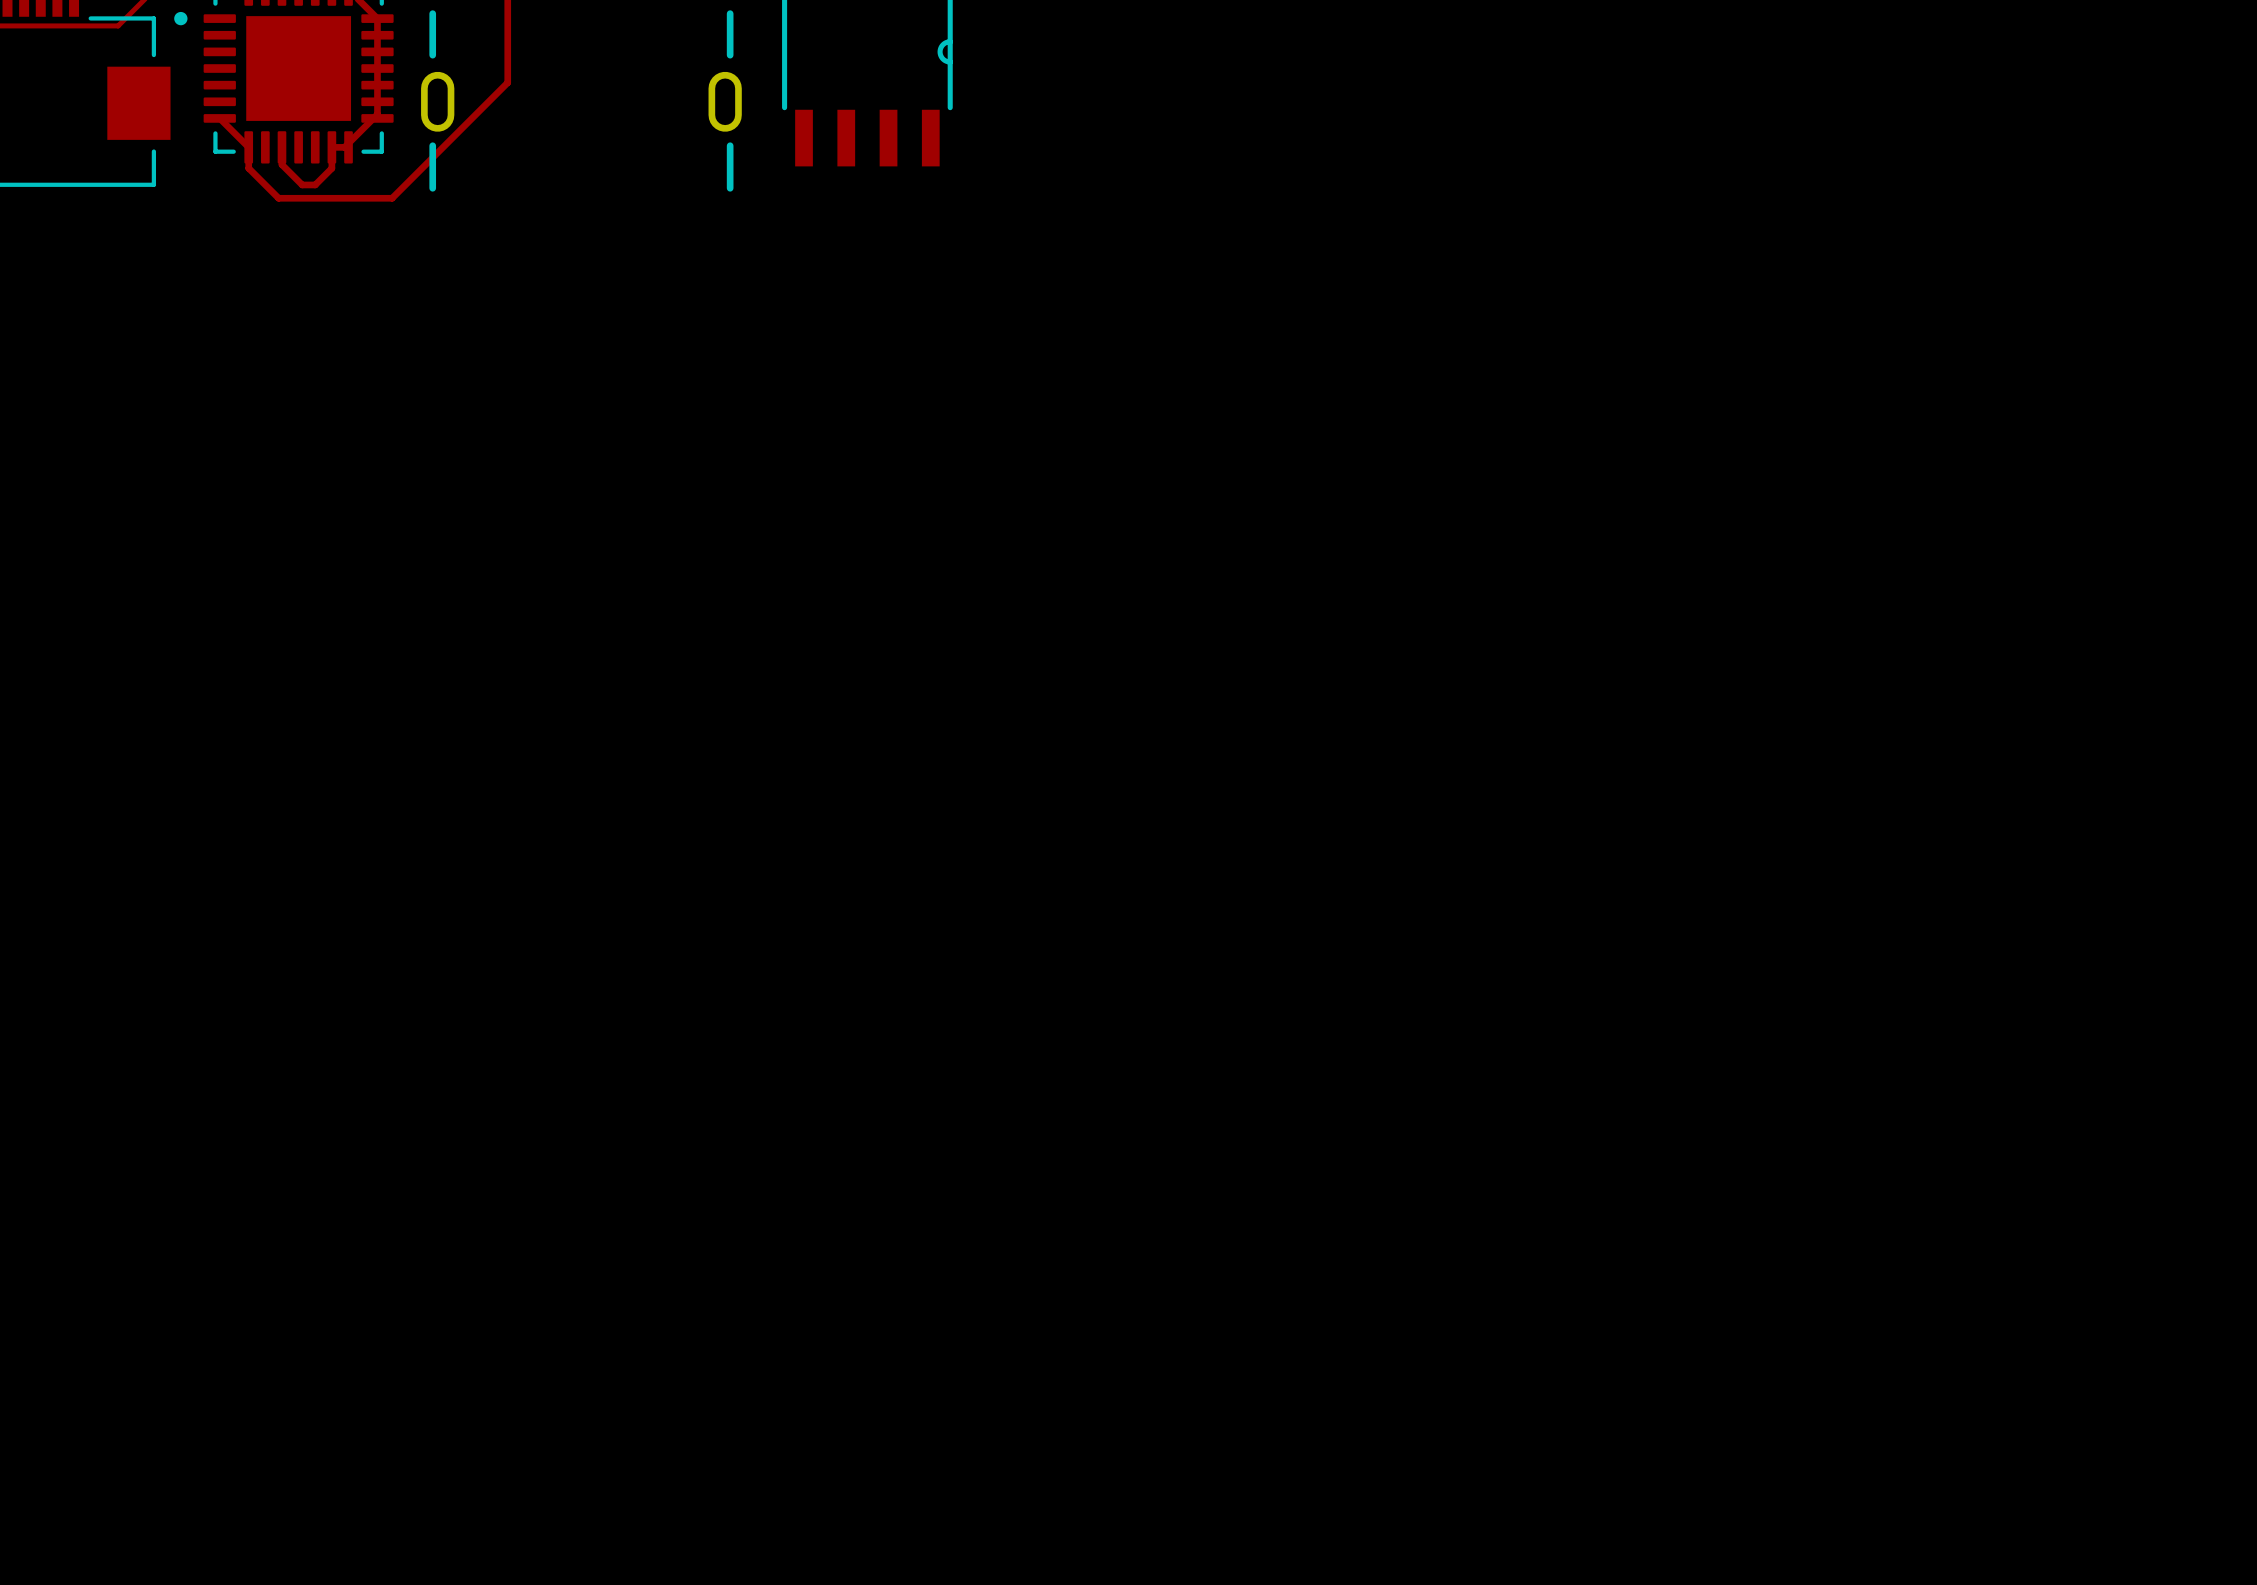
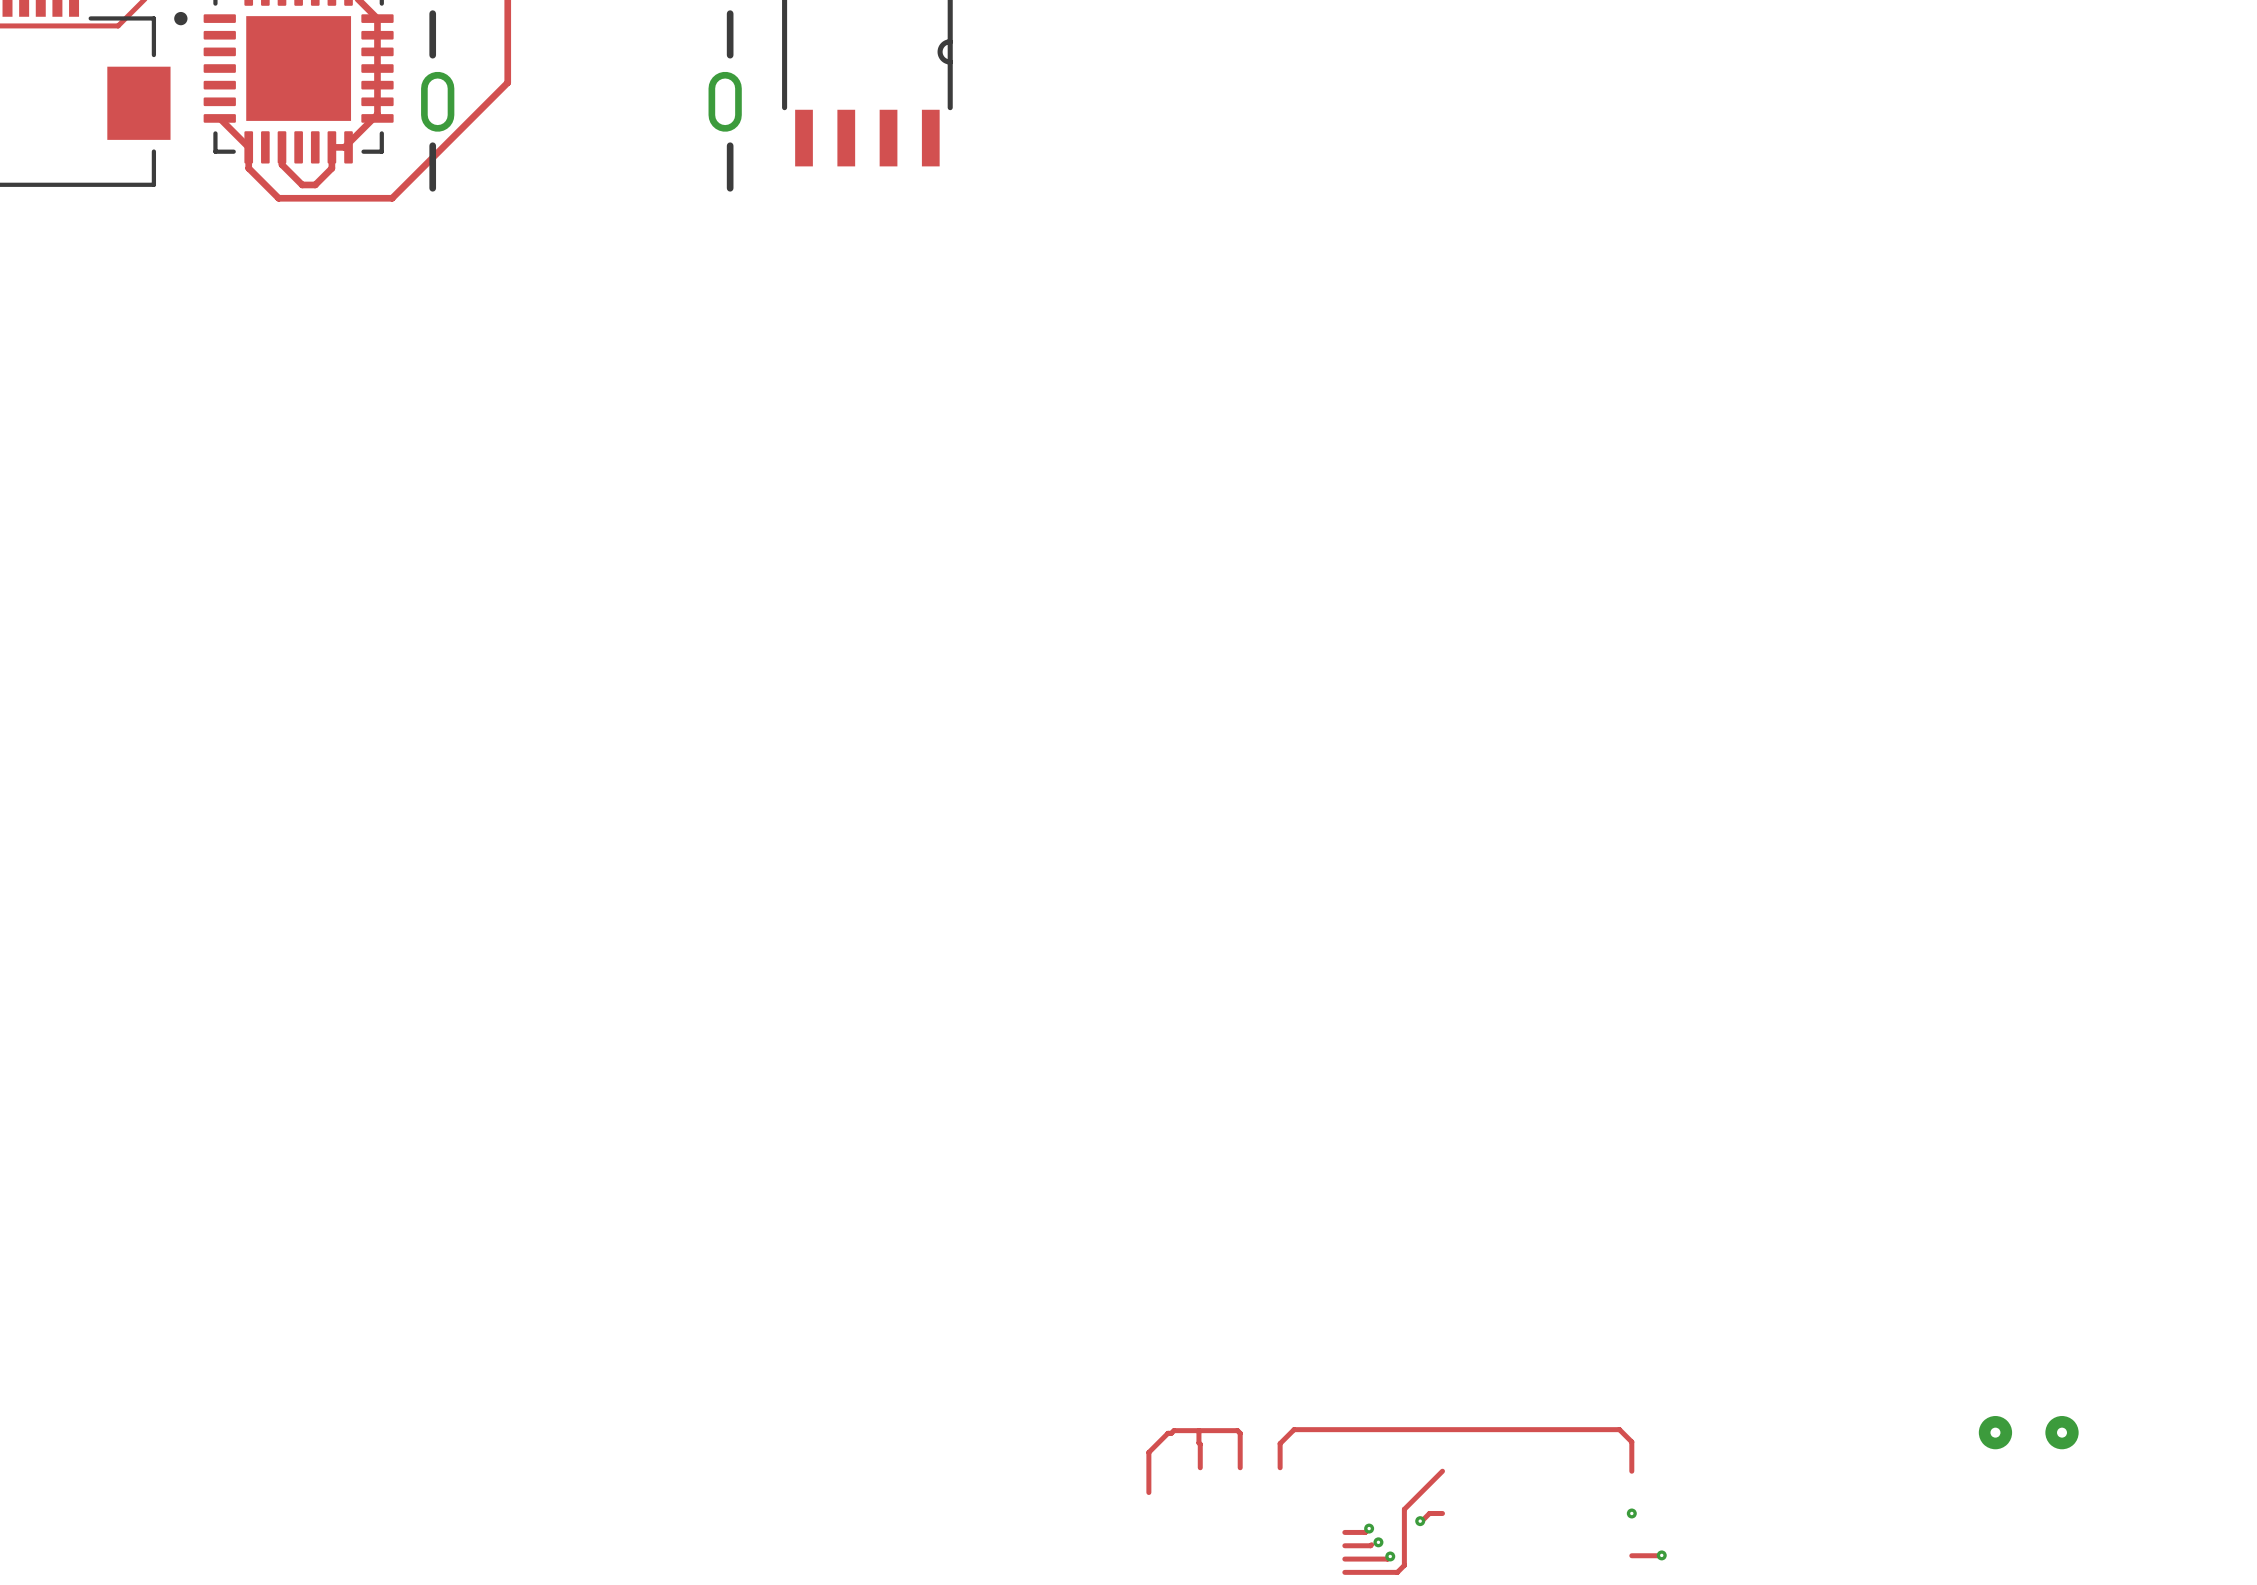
track: none -> (1198, 1430) (1200, 1467)
via: none -> (1995, 1432)
via: none -> (2062, 1432)
track: none -> (1240, 1467) (1240, 1433) (1237, 1430) (1173, 1430) (1168, 1433) (1148, 1452) (1148, 1492)
track: none -> (1280, 1467) (1280, 1443) (1294, 1429) (1619, 1429) (1631, 1441) (1631, 1471)
track: none -> (1442, 1471) (1404, 1509) (1404, 1565) (1397, 1572) (1344, 1572)
track: none -> (1442, 1513) (1429, 1513) (1420, 1520)
via: none -> (1631, 1513)
via: none -> (1420, 1521)
track: none -> (1369, 1528) (1365, 1532) (1344, 1532)
via: none -> (1369, 1528)
via: none -> (1378, 1542)
track: none -> (1371, 1544) (1344, 1545)
track: none -> (1631, 1555) (1661, 1555)
via: none -> (1661, 1555)
track: none -> (1390, 1556) (1387, 1559) (1344, 1559)
via: none -> (1390, 1556)

